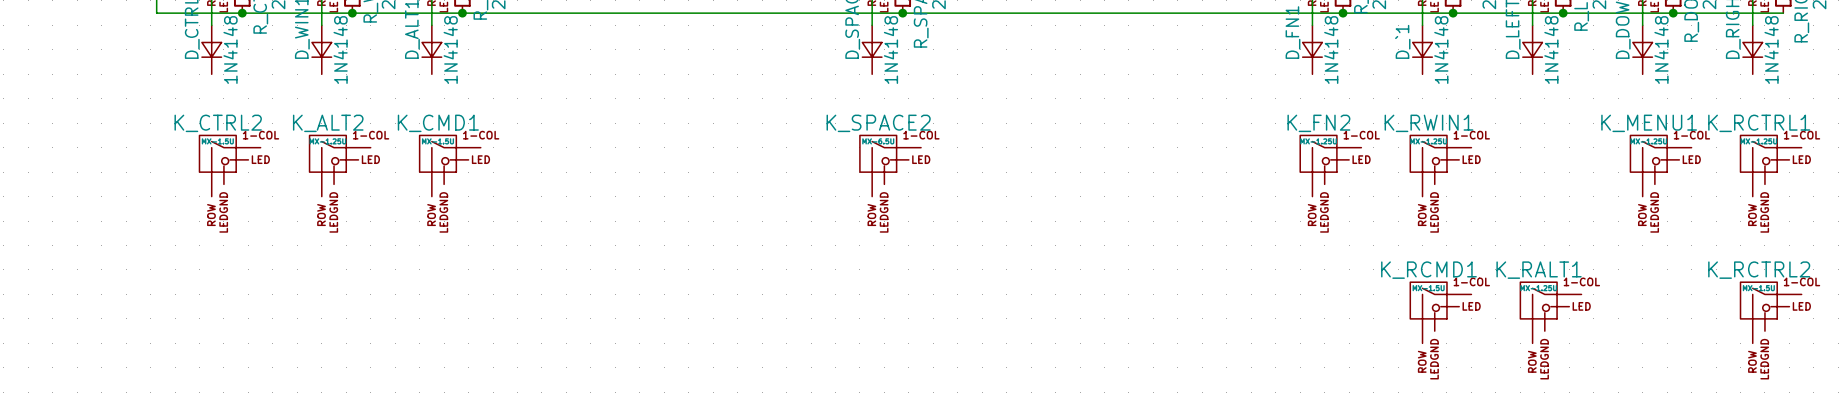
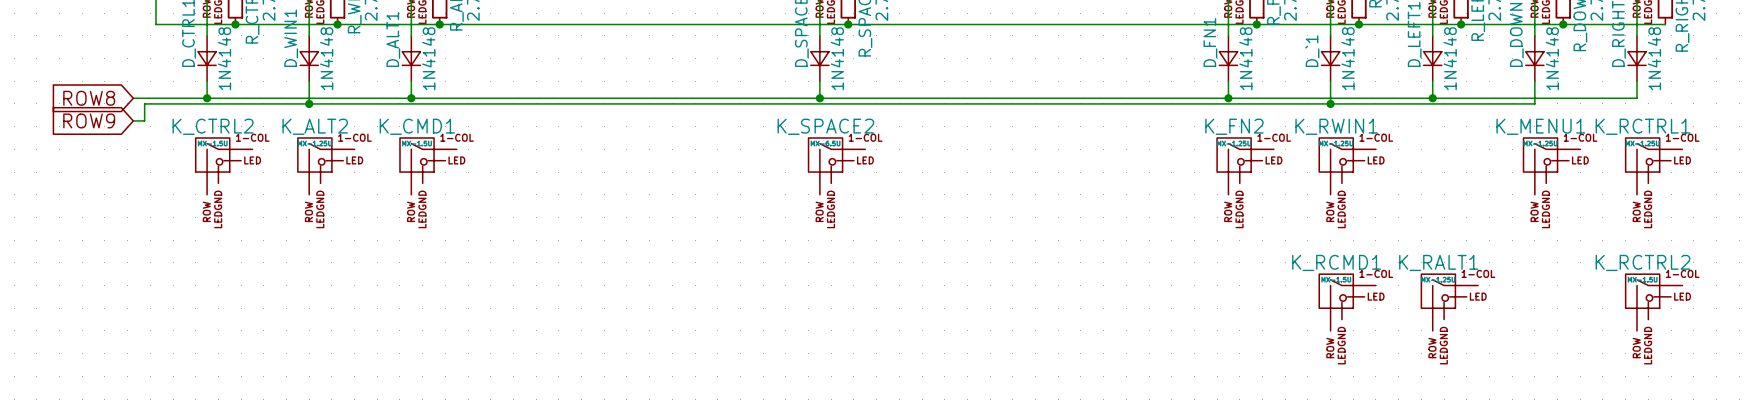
wire: none -> (207, 81) (207, 98)
wire: none -> (309, 81) (309, 103)
wire: none -> (411, 81) (411, 98)
wire: none -> (819, 81) (819, 98)
wire: none -> (1228, 81) (1228, 98)
wire: none -> (1330, 81) (1330, 103)
wire: none -> (1432, 81) (1432, 98)
wire: none -> (1534, 81) (1534, 103) (144, 103) (144, 120) (133, 120)
wire: none -> (1636, 81) (1636, 98) (133, 98)
global label: none -> ROW8 (89, 98)
junction: none -> (207, 98)
junction: none -> (411, 98)
junction: none -> (819, 98)
junction: none -> (1228, 98)
junction: none -> (1432, 98)
junction: none -> (309, 103)
junction: none -> (1330, 103)
global label: none -> ROW9 (89, 120)

